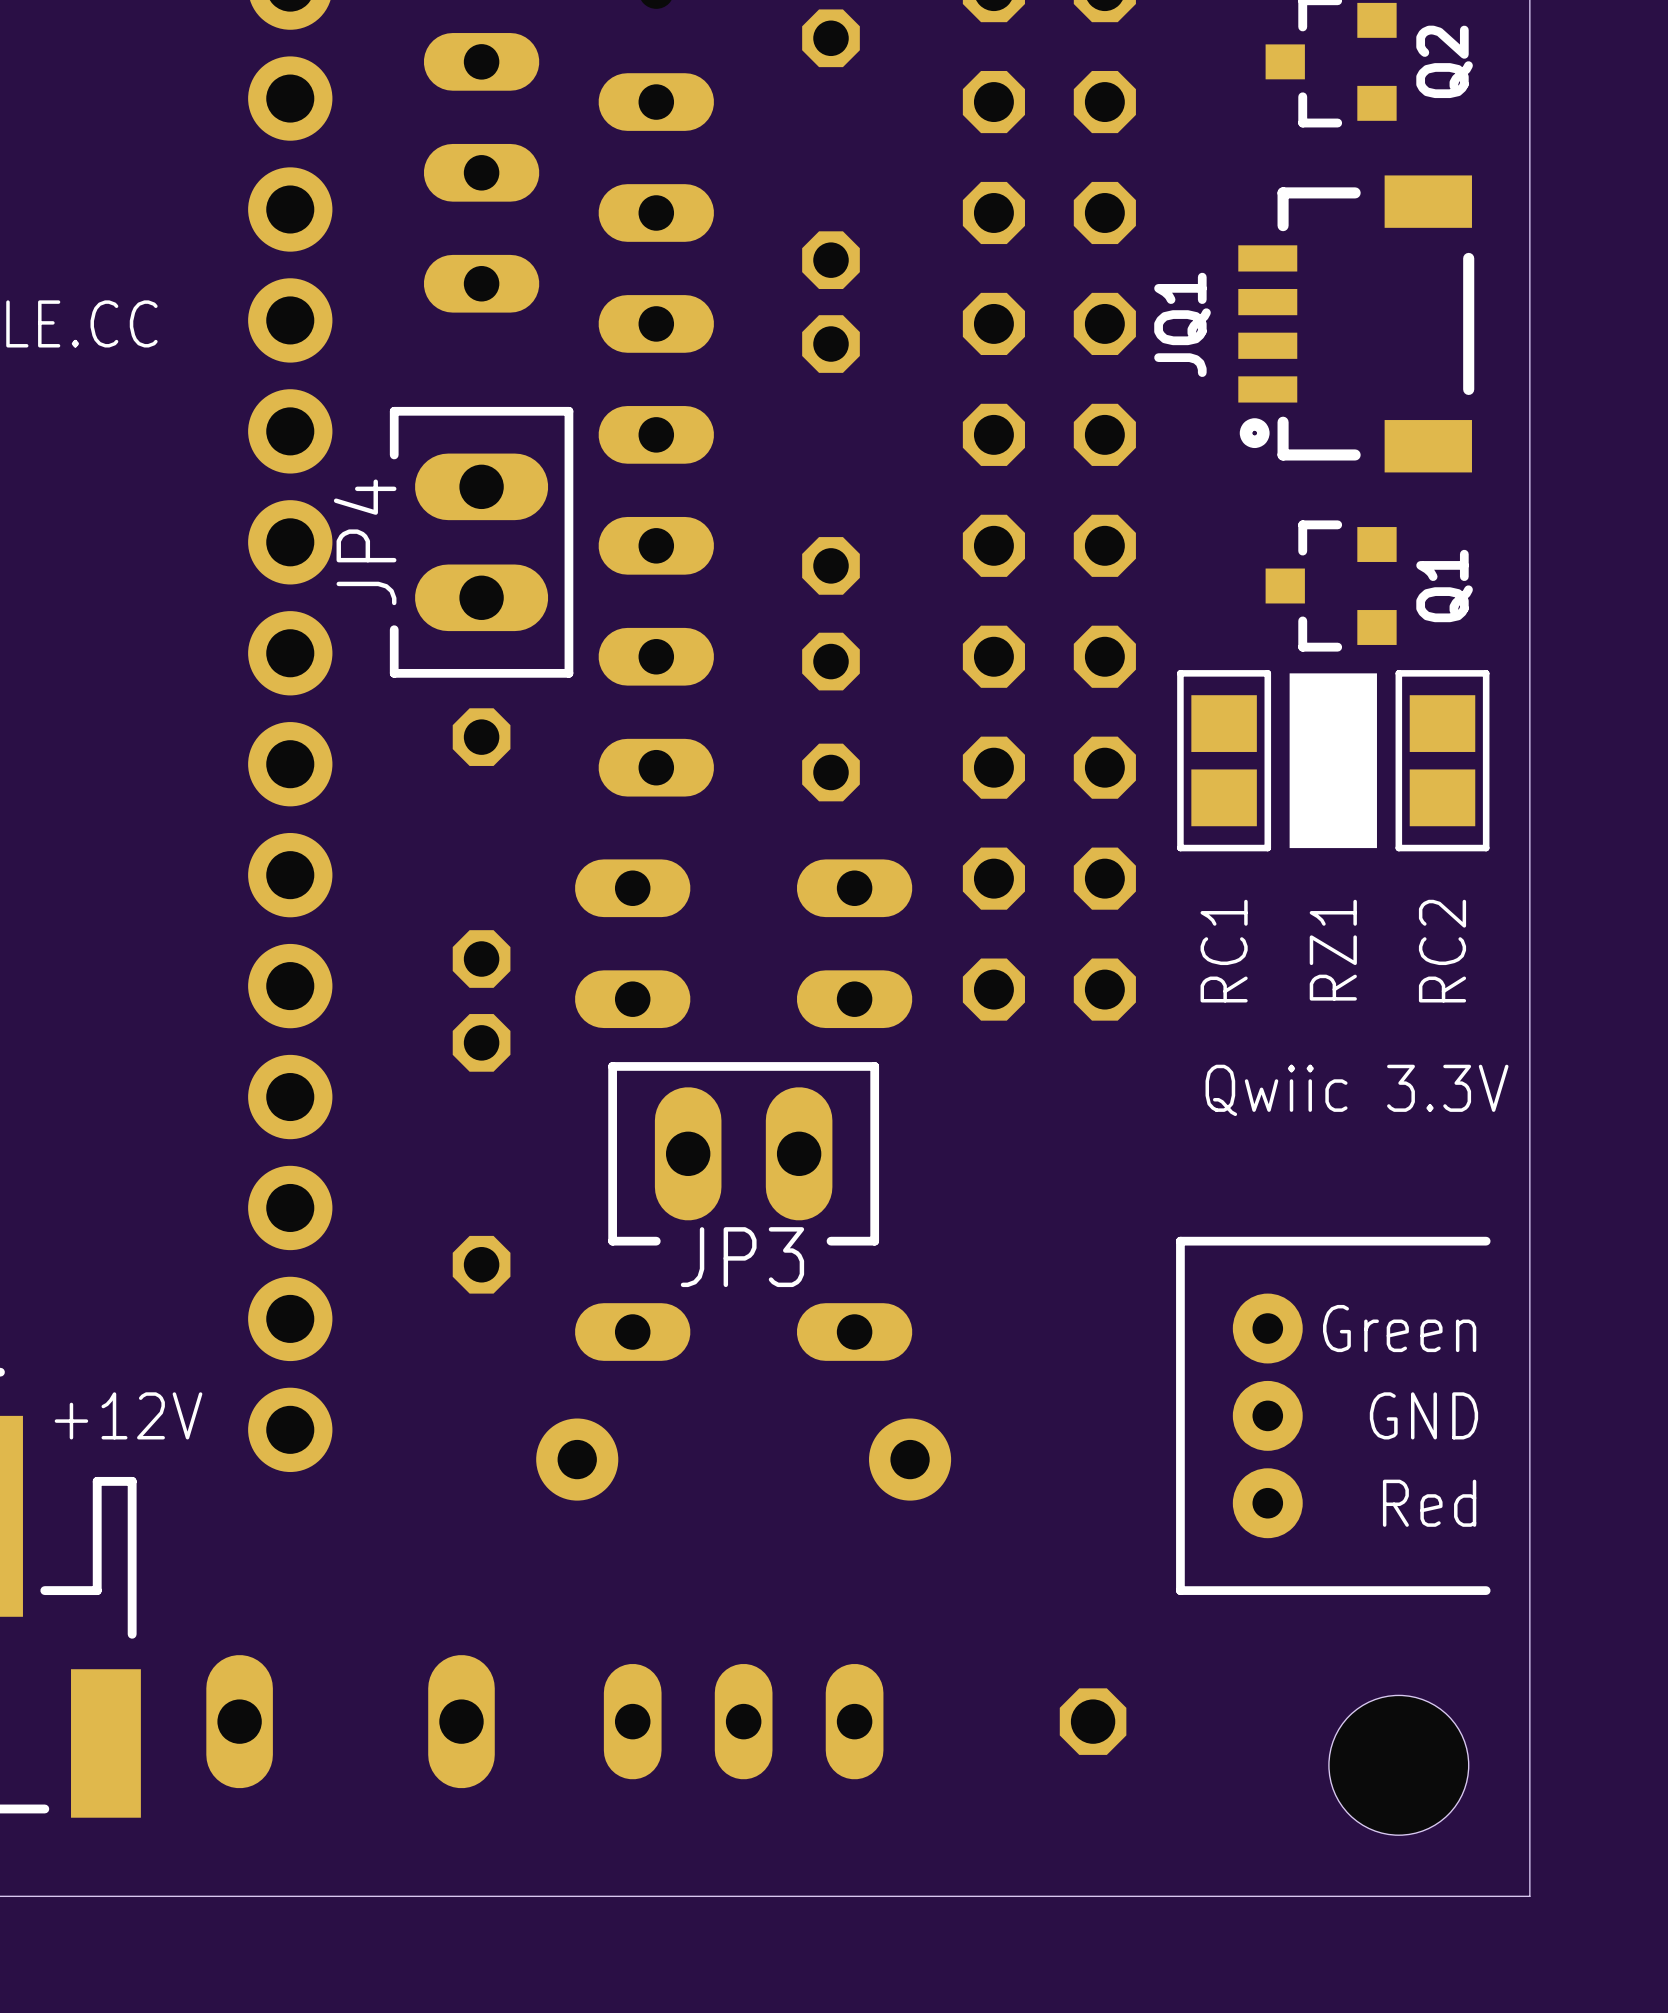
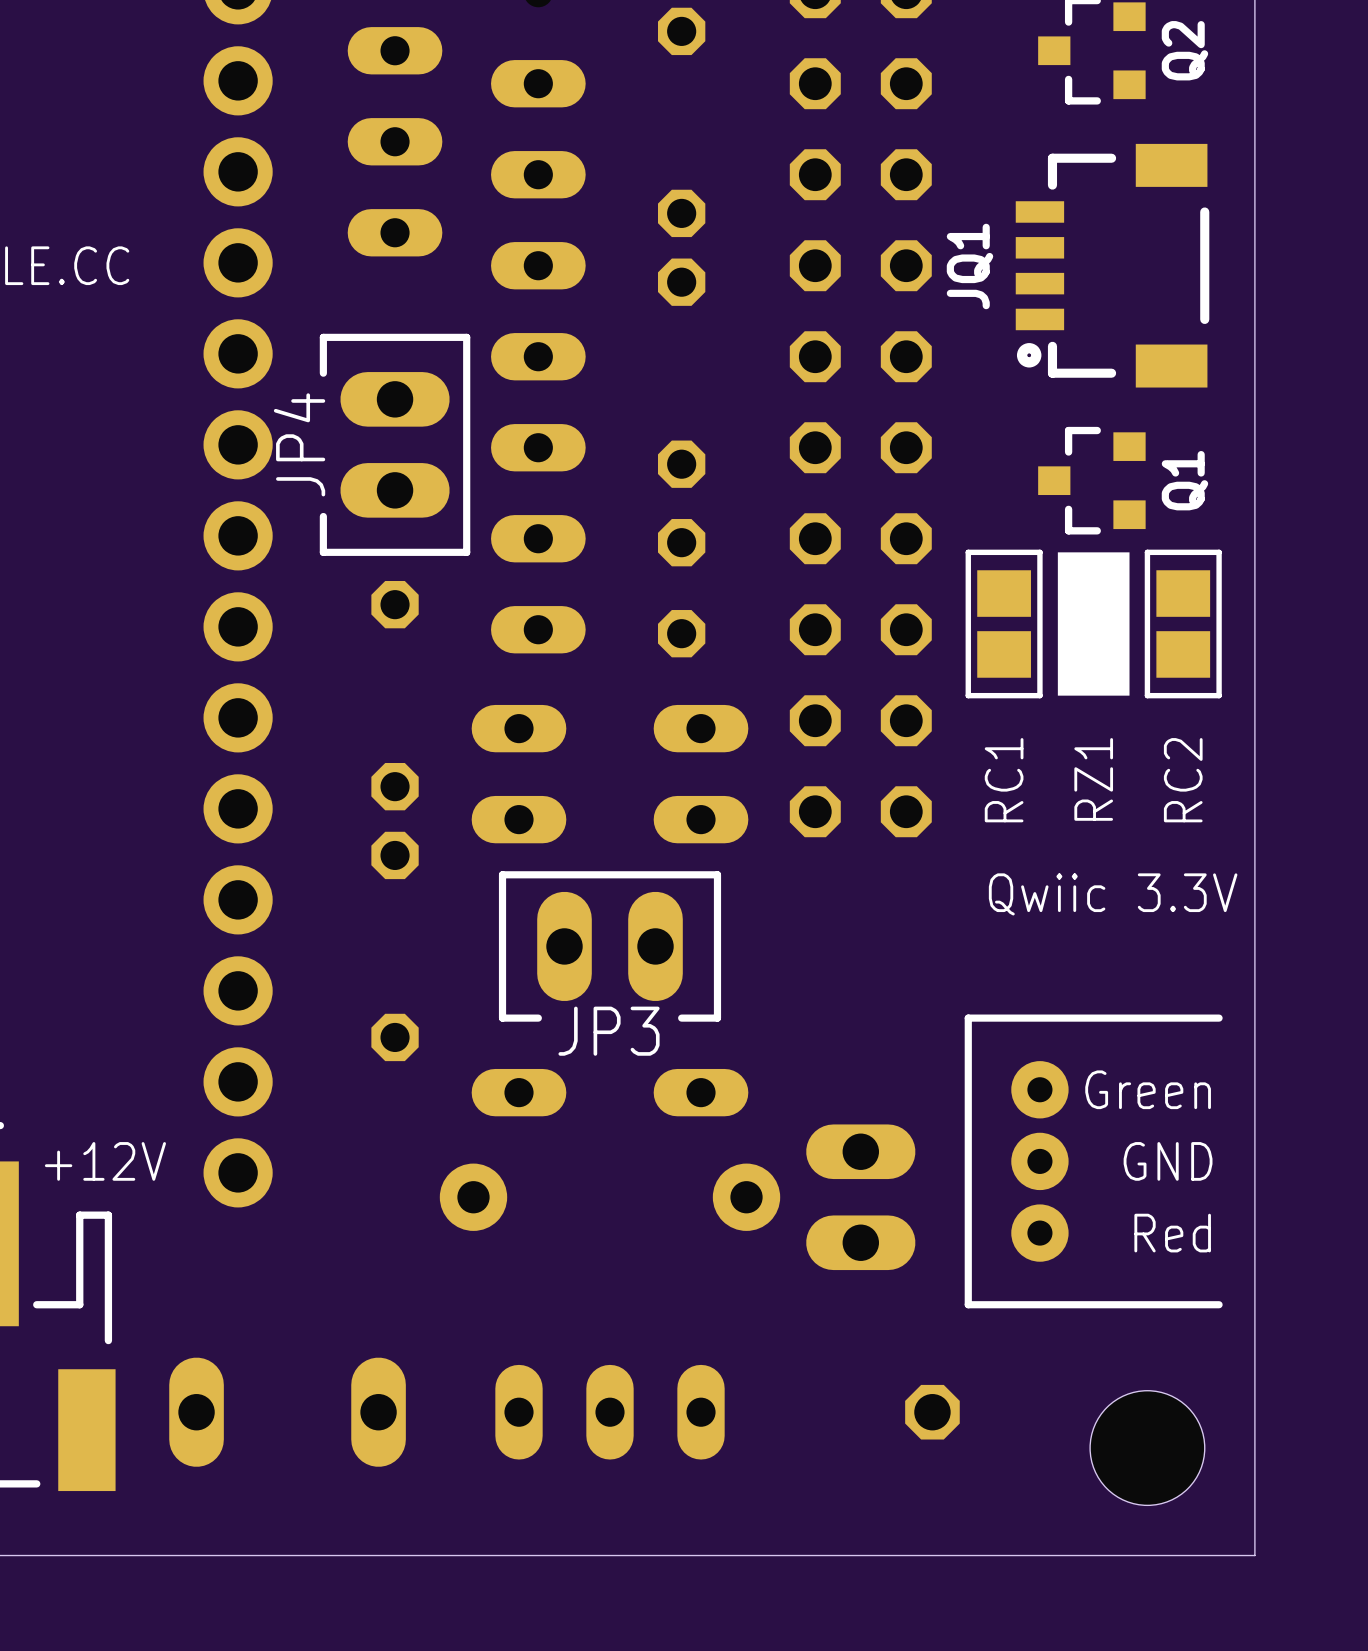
part: none -> (860, 1197)
part position: (1093, 1721) -> (932, 1412)

